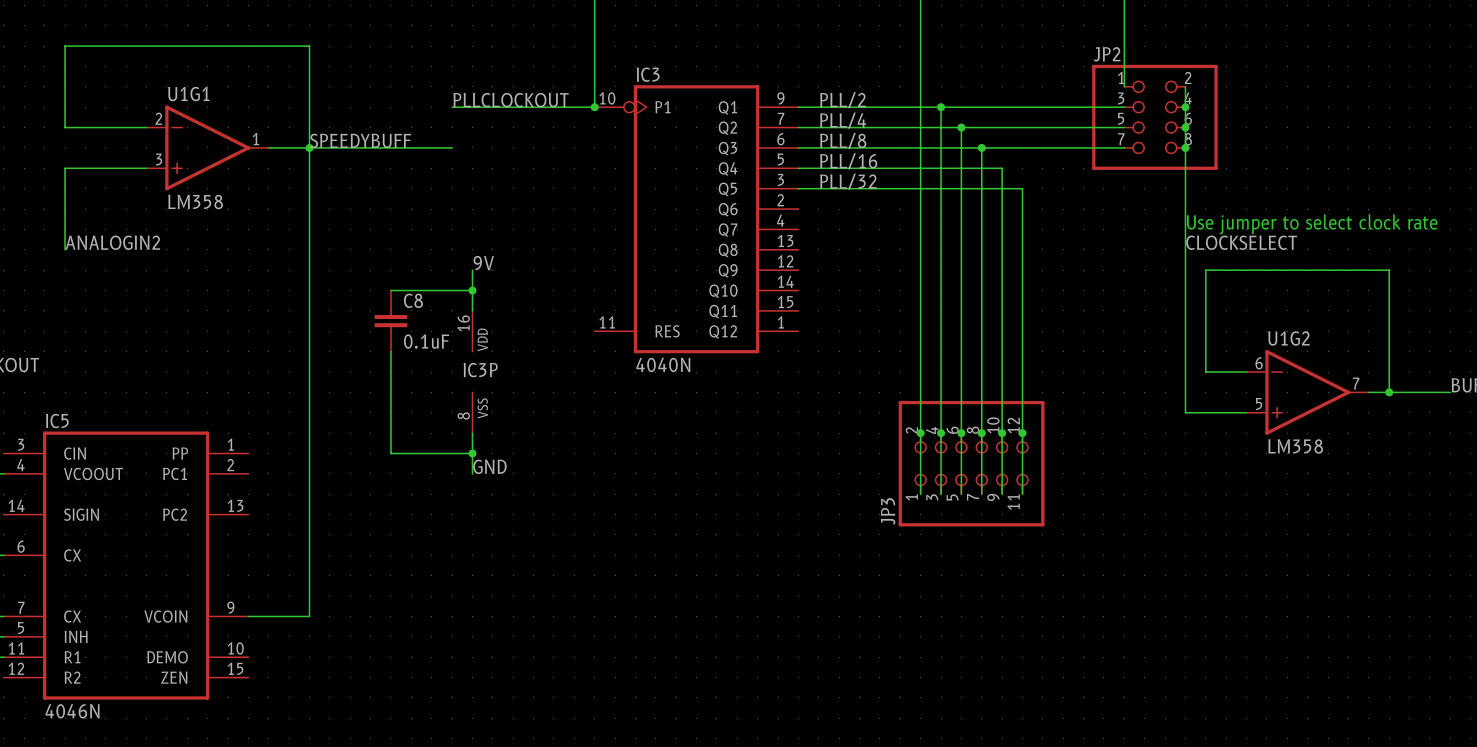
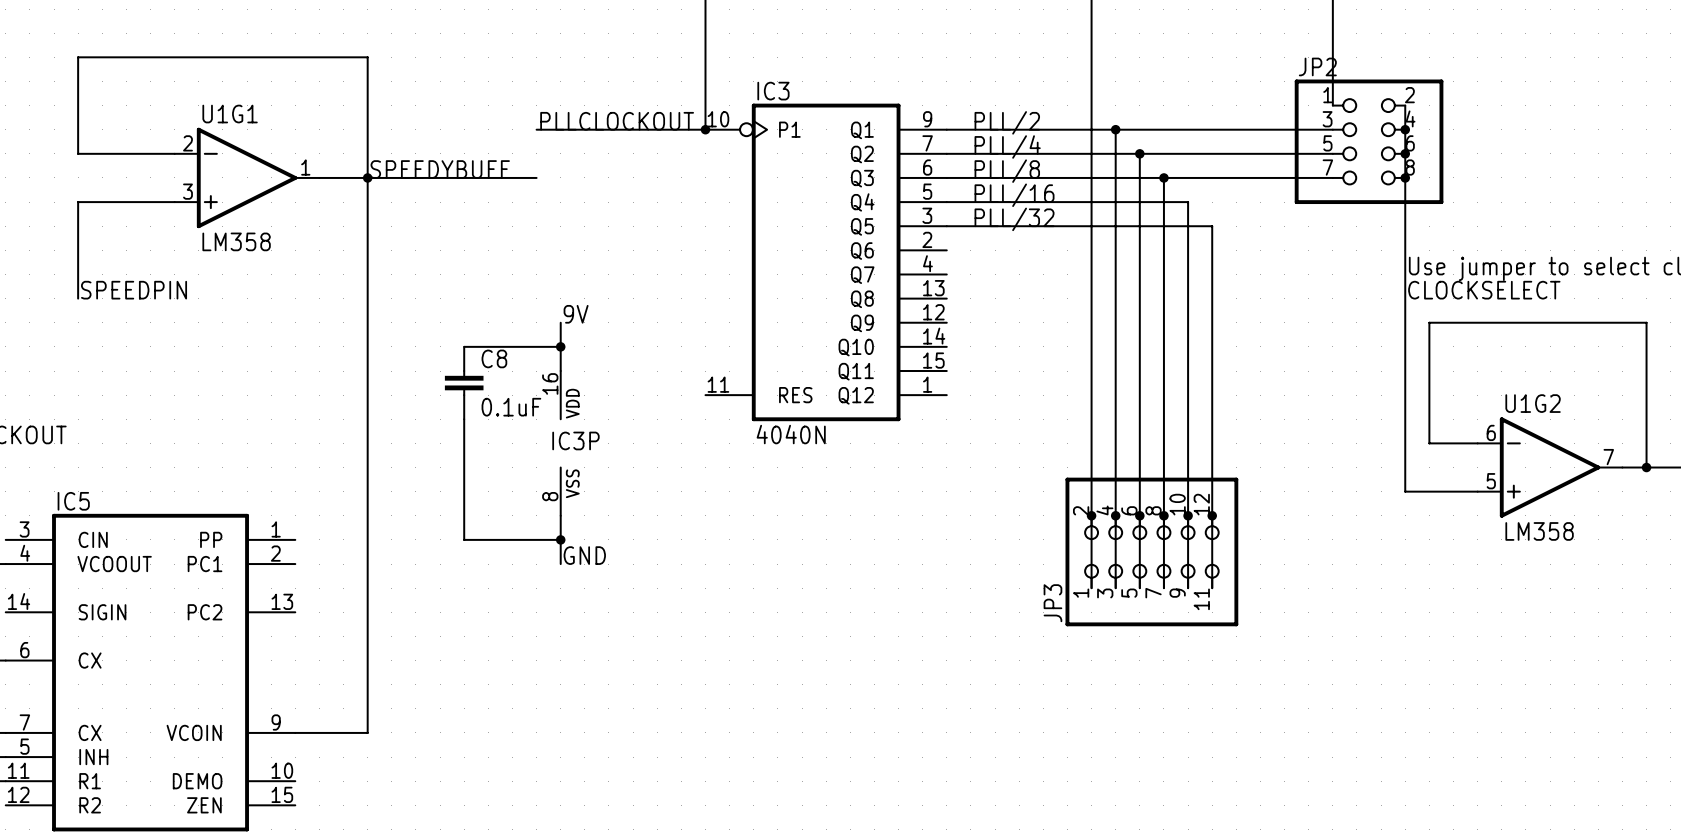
label: ANALOGIN2 (112, 242) -> SPEEDPIN (134, 290)

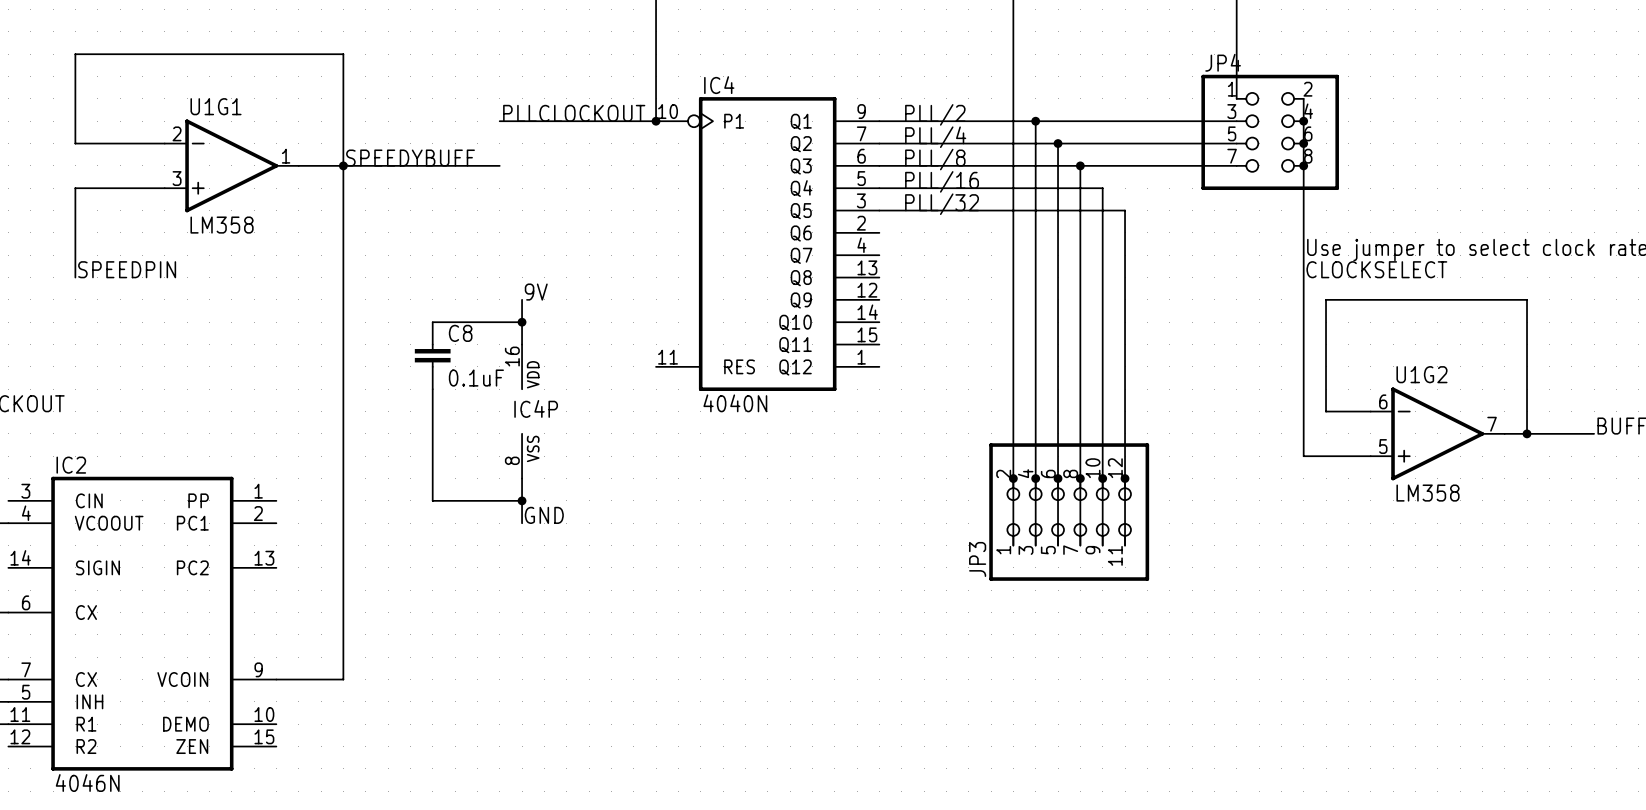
JP2 name: JP2 (1317, 66) -> JP4 (1223, 62)
IC3 name: IC3 (773, 91) -> IC4 (719, 85)
IC3P name: IC3P (575, 440) -> IC4P (536, 408)
IC5 name: IC5 (73, 501) -> IC2 (71, 465)

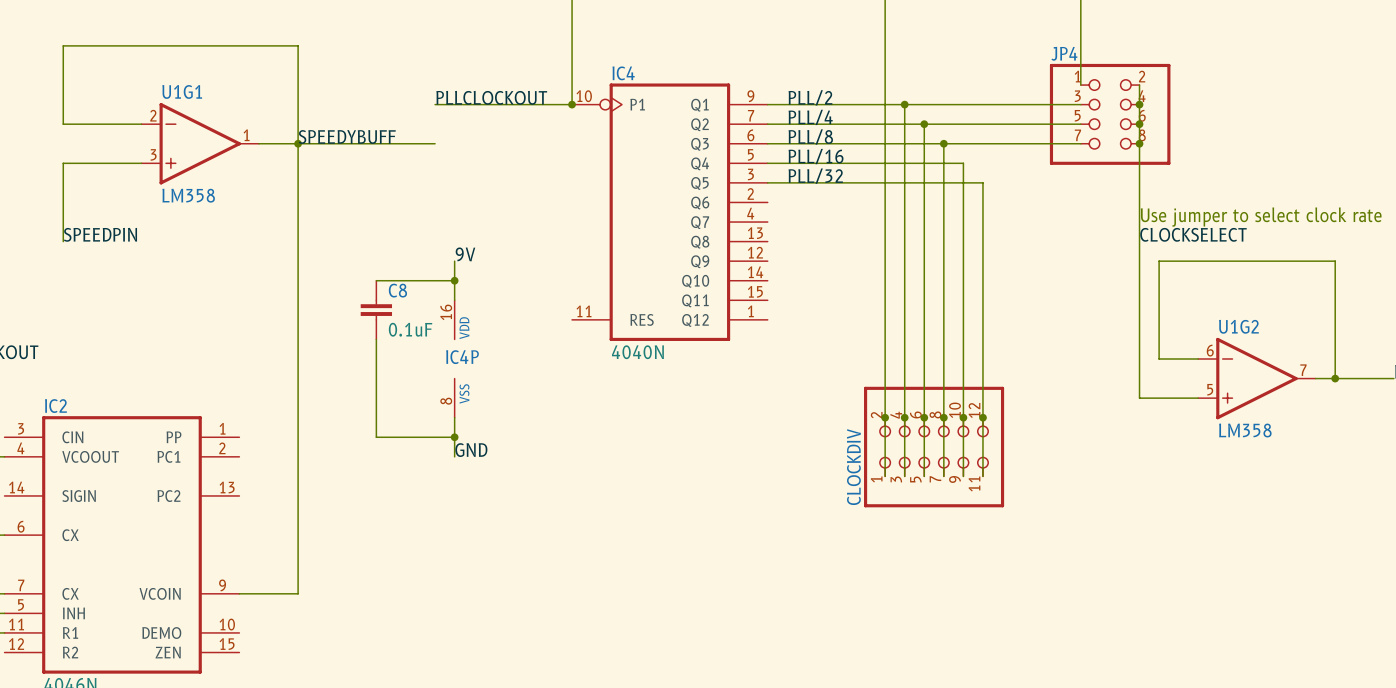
JP3 name: JP3 (977, 559) -> CLOCKDIV (853, 467)

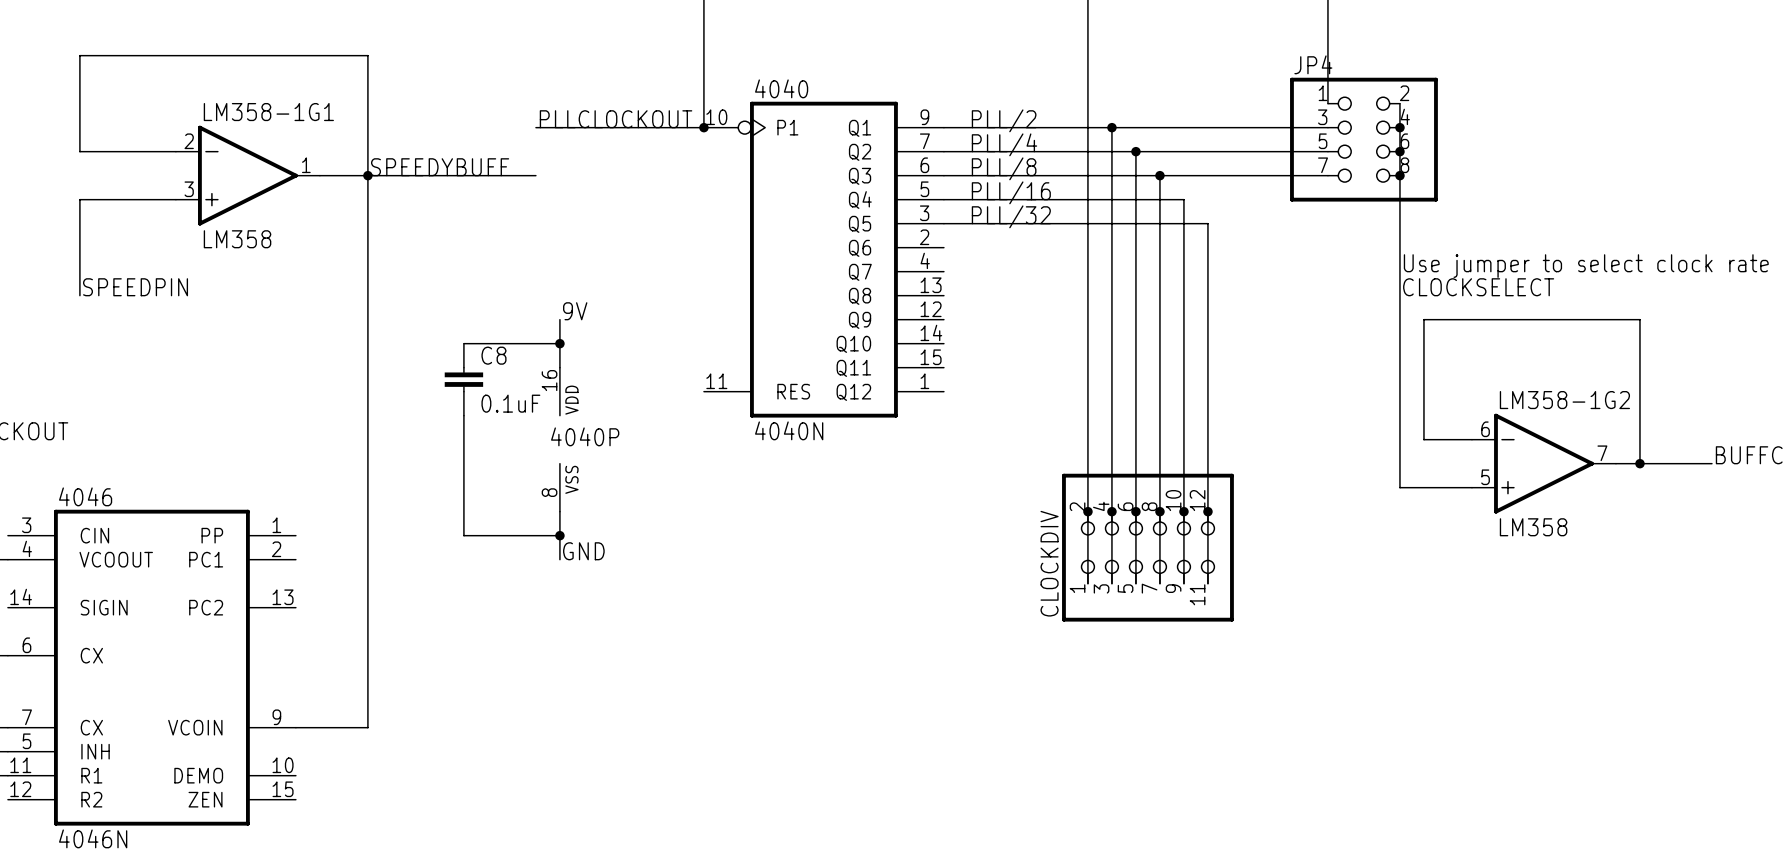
IC4 name: IC4 (623, 73) -> 4040 (781, 88)
U1G1 name: U1G1 (182, 91) -> LM358-1G1 (268, 112)
U1G2 name: U1G2 (1238, 326) -> LM358-1G2 (1564, 400)
IC4P name: IC4P (462, 357) -> 4040P (585, 436)
IC2 name: IC2 (55, 406) -> 4046 (85, 496)

